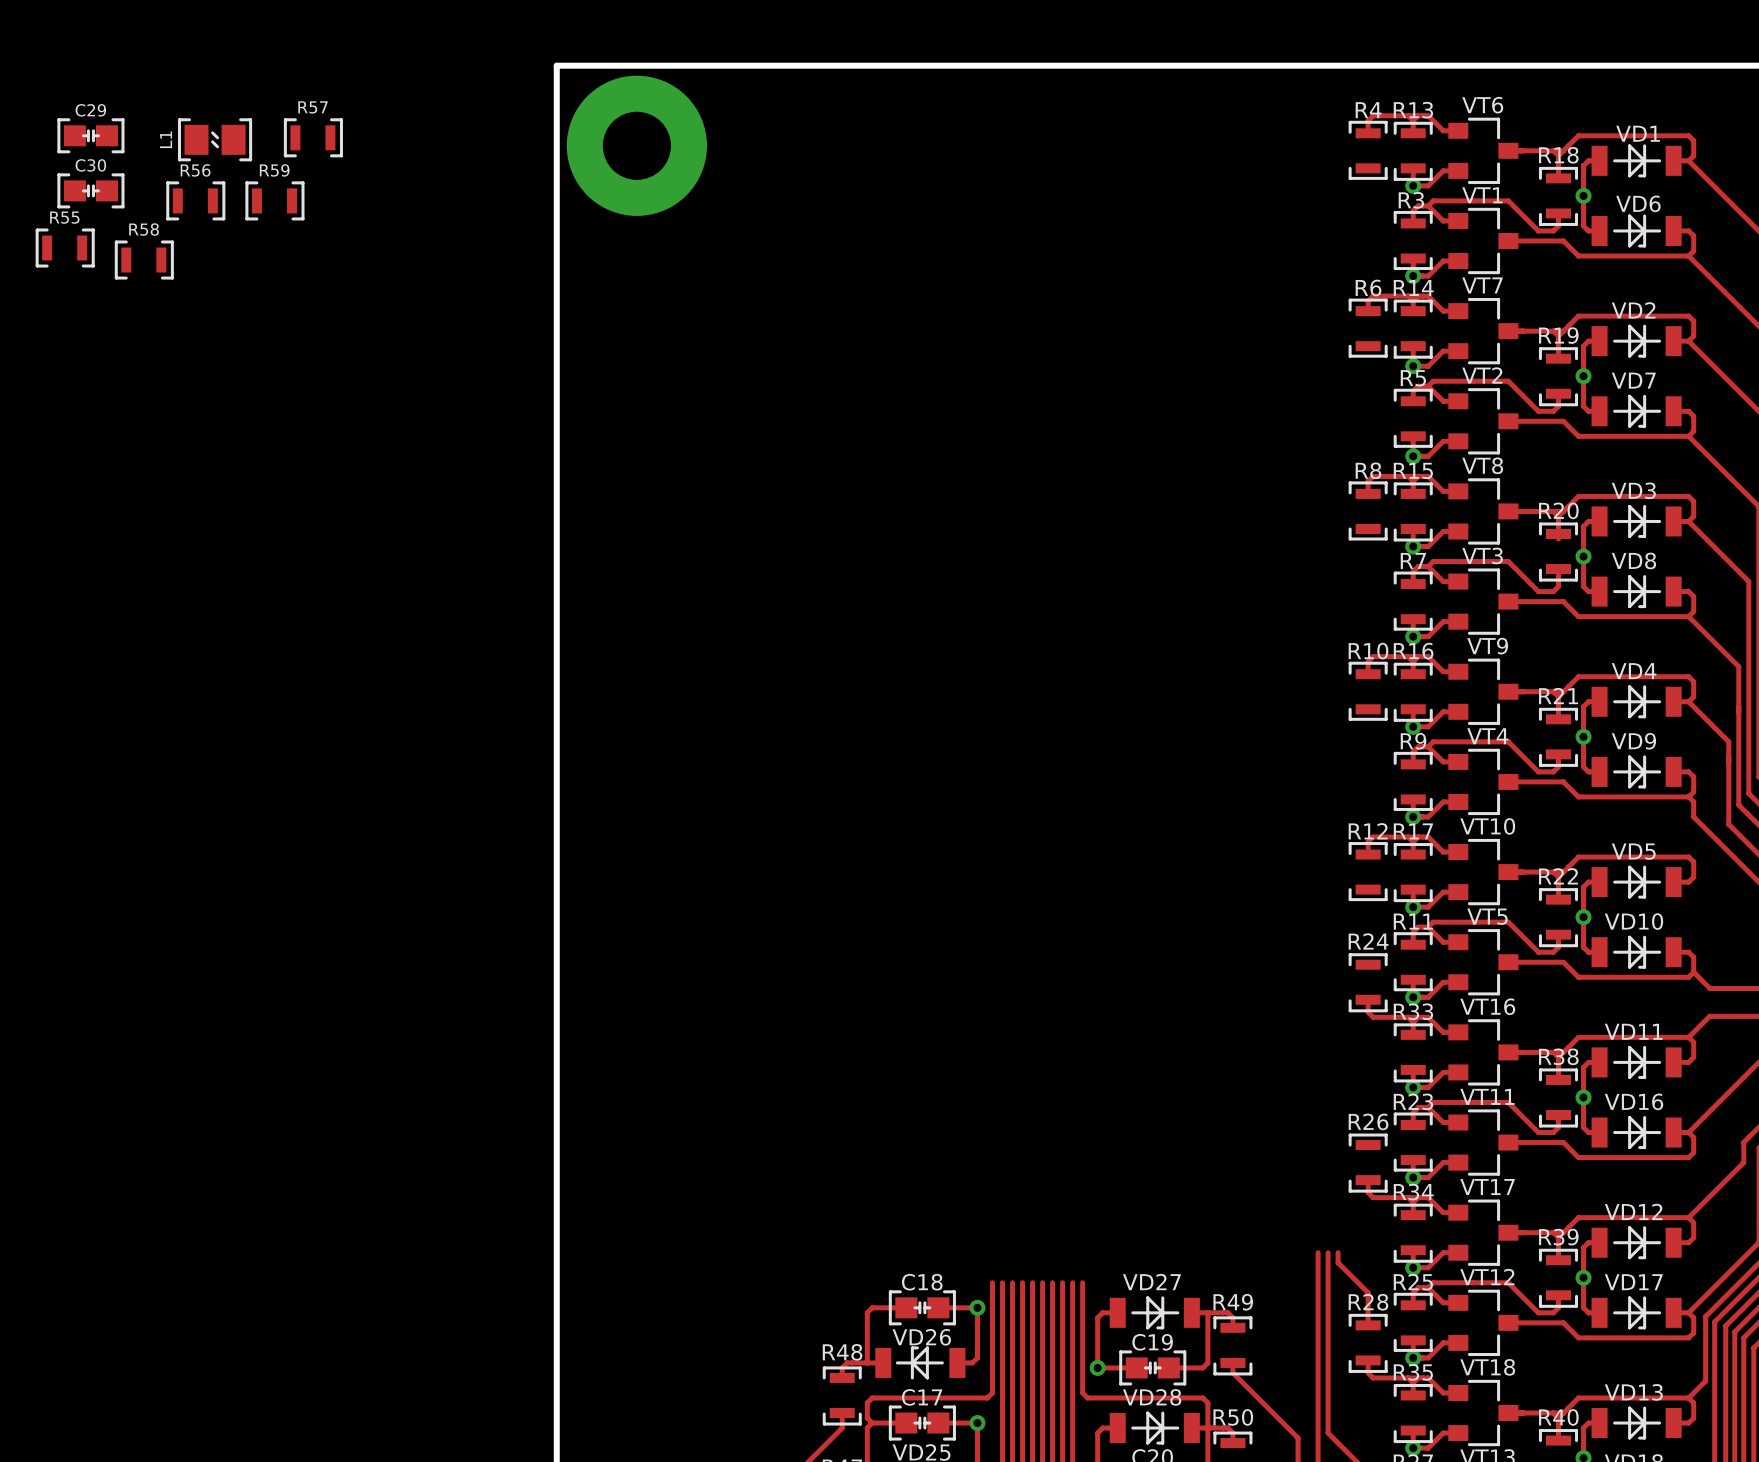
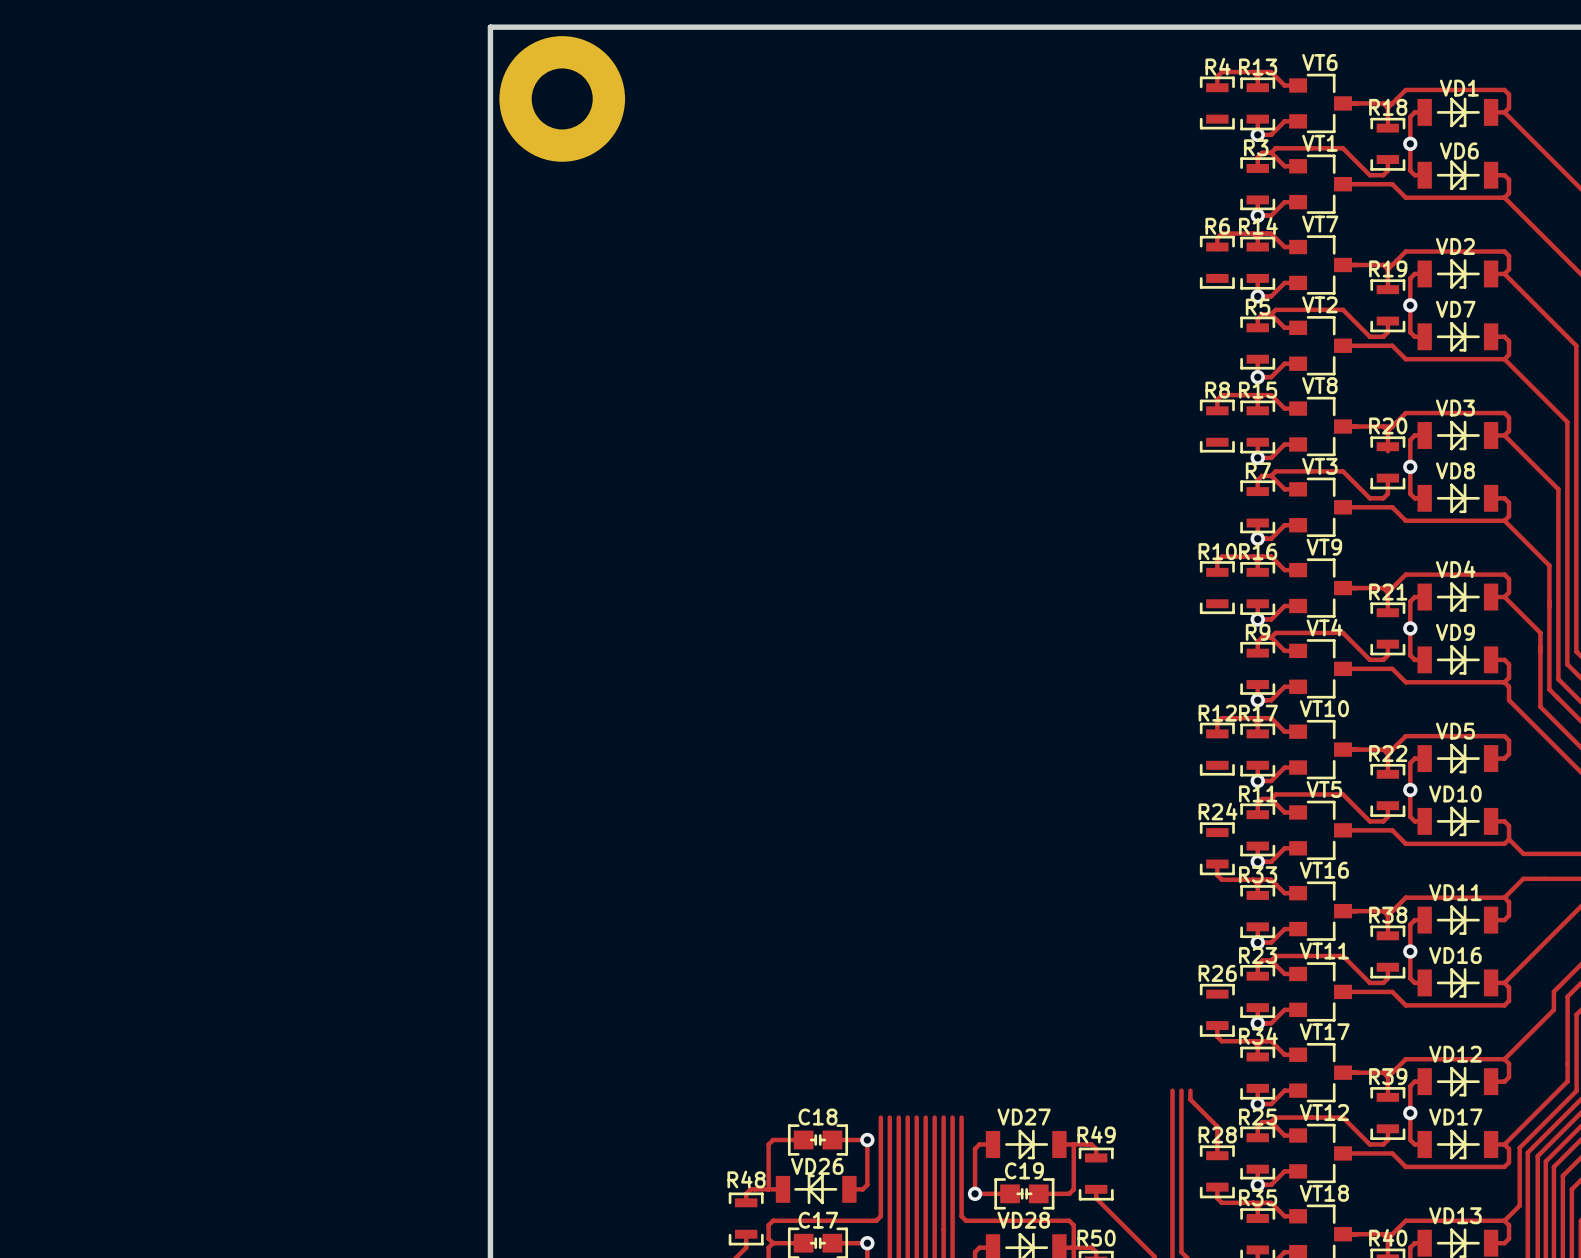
C29: (90, 135) -> none
R57: (313, 137) -> none
L1: (215, 139) -> none
C30: (90, 190) -> none
R56: (195, 200) -> none
R59: (274, 200) -> none
R55: (65, 248) -> none
R58: (144, 260) -> none

